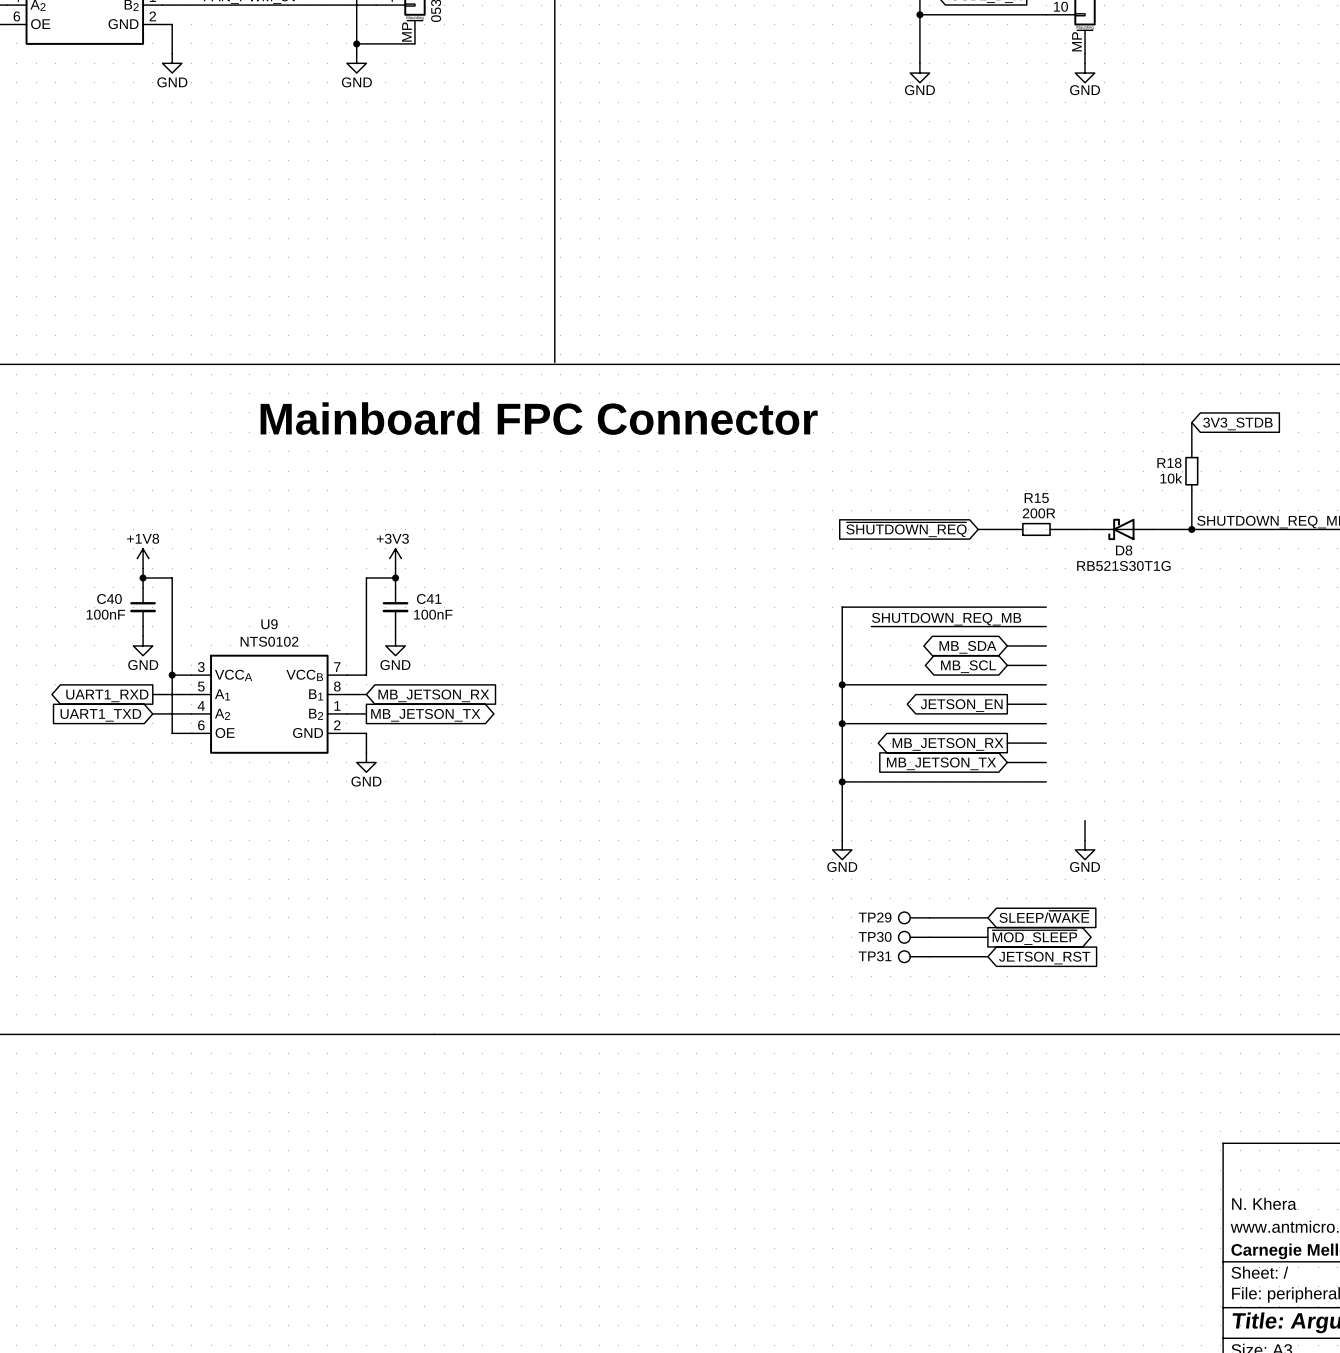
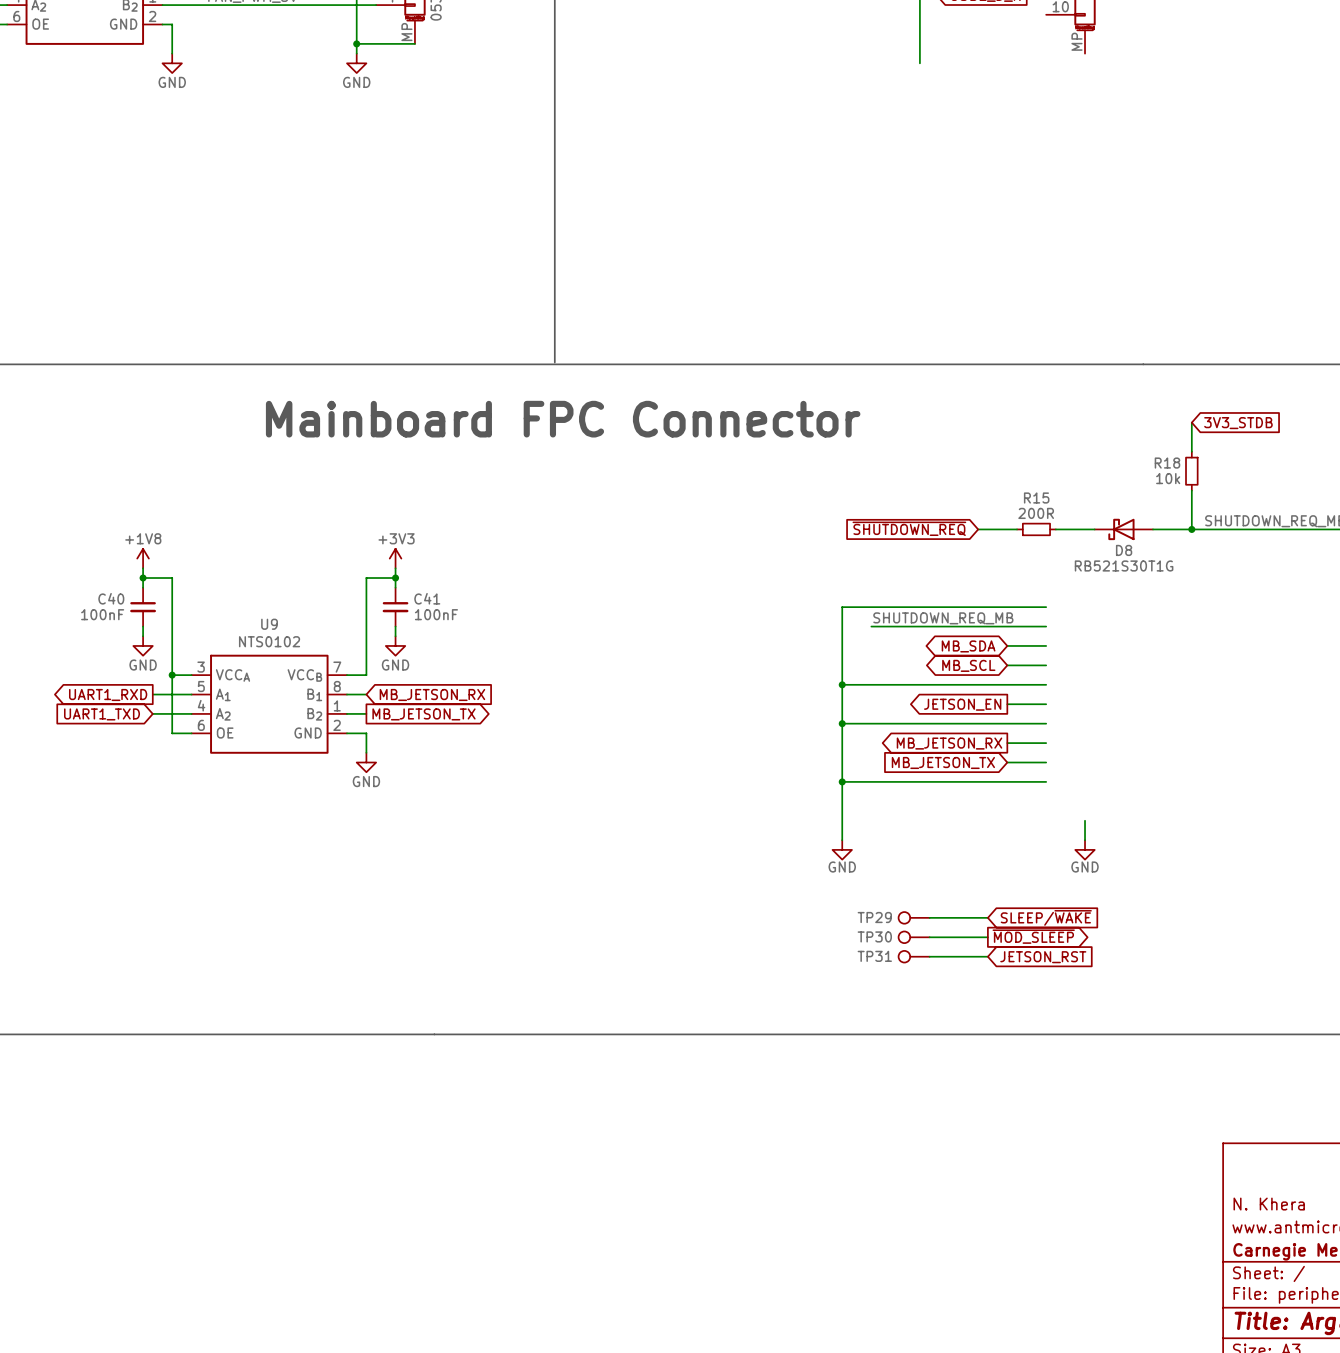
wire: (919, 14) (1046, 14) -> none
junction: (919, 14) -> none
wire: (1085, 53) (1085, 63) -> none
power symbol: GND (919, 73) -> none
power symbol: GND (1085, 73) -> none

